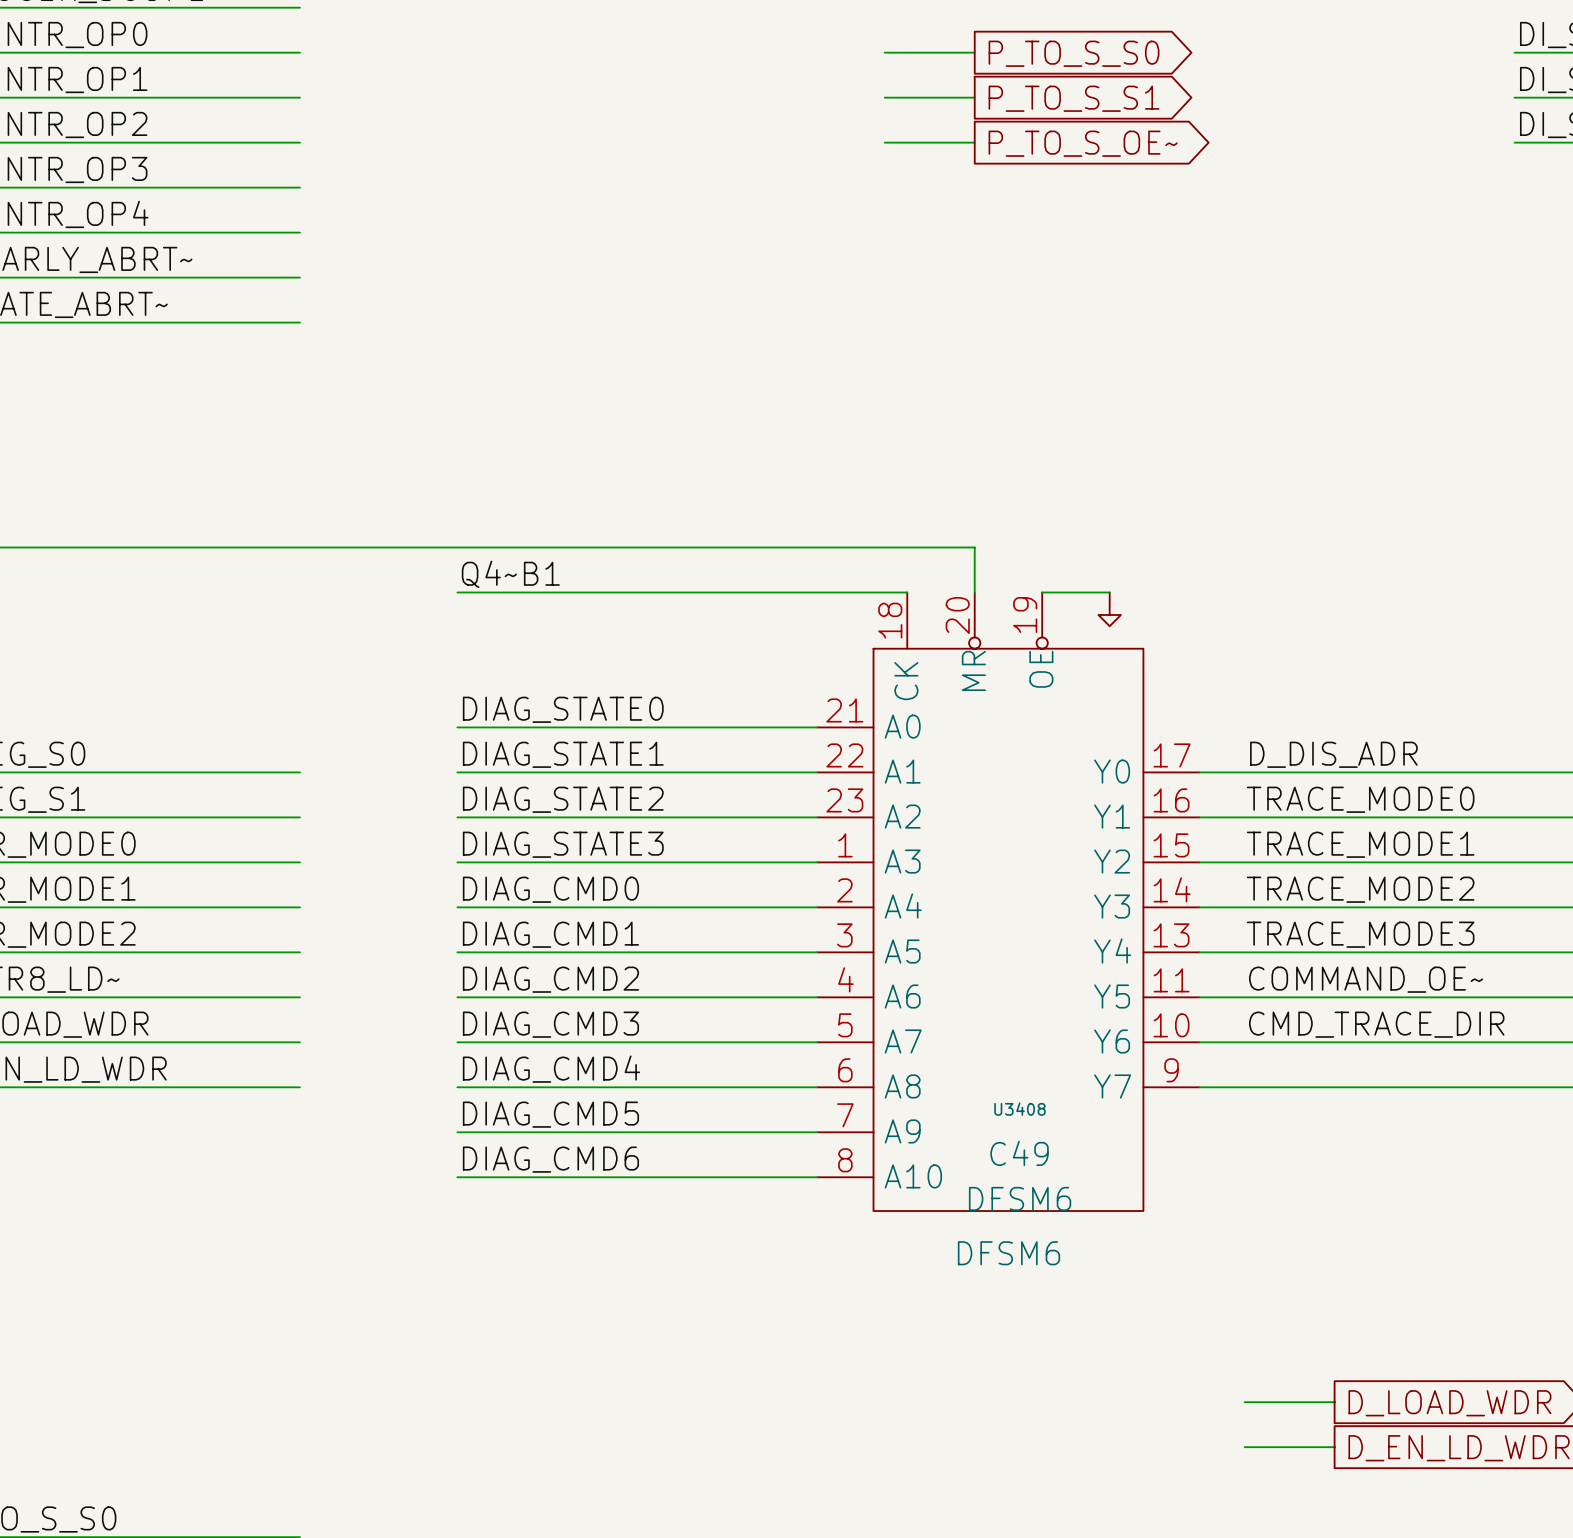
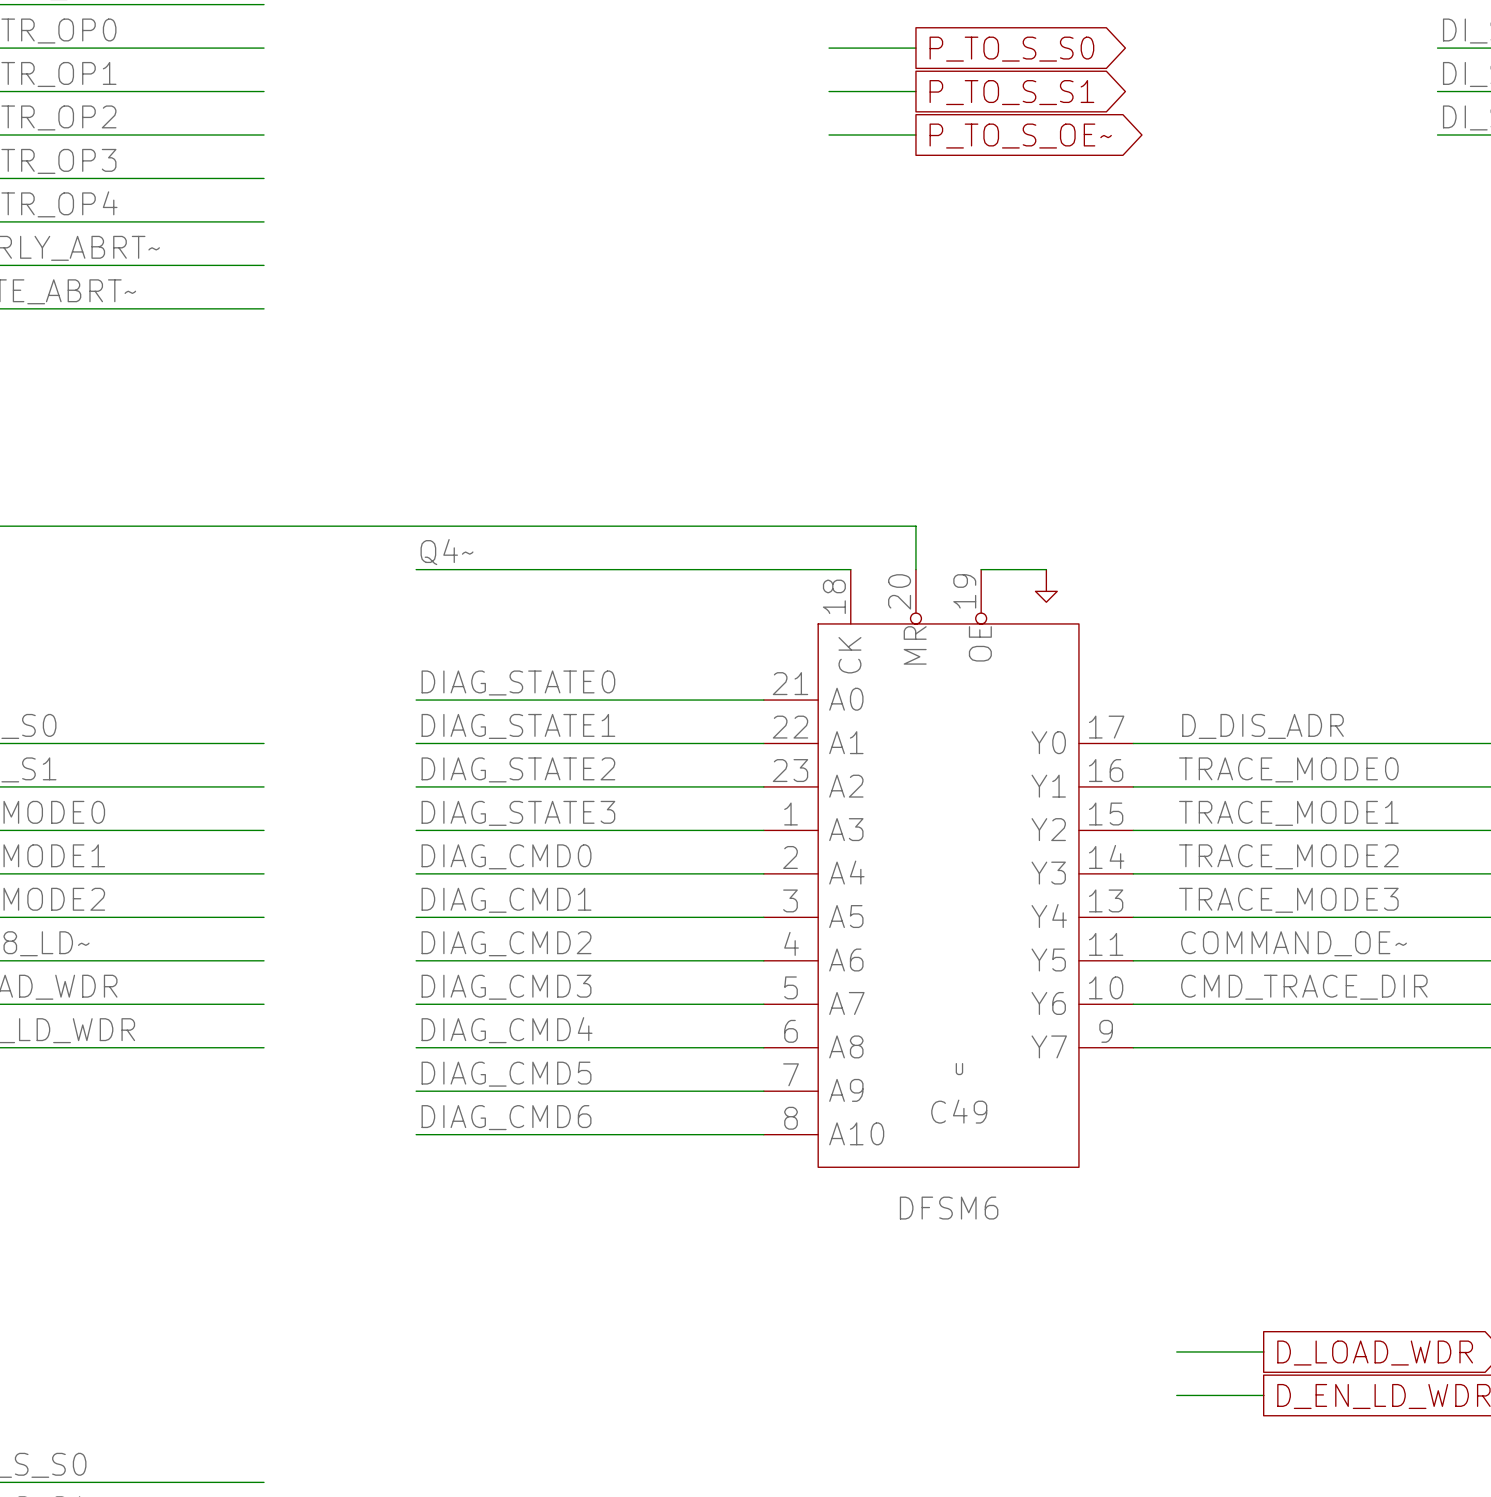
label: Q4~B1 (510, 574) -> Q4~ (447, 552)
U3408 name: U3408 (1019, 1109) -> U (959, 1069)
U3408 value: DFSM6 (1020, 1198) -> none

